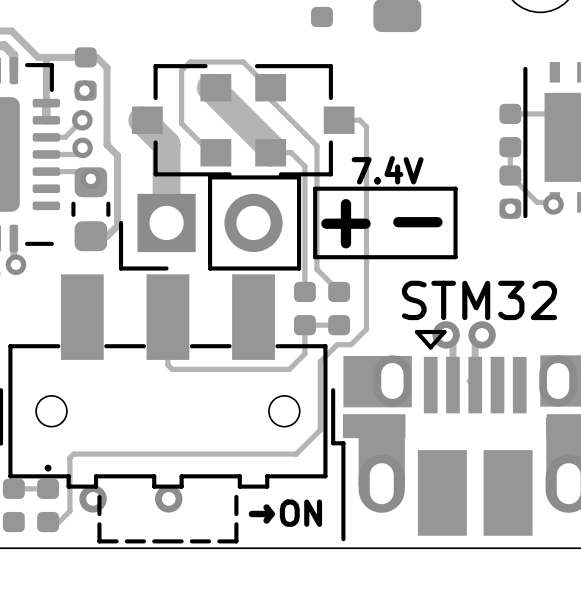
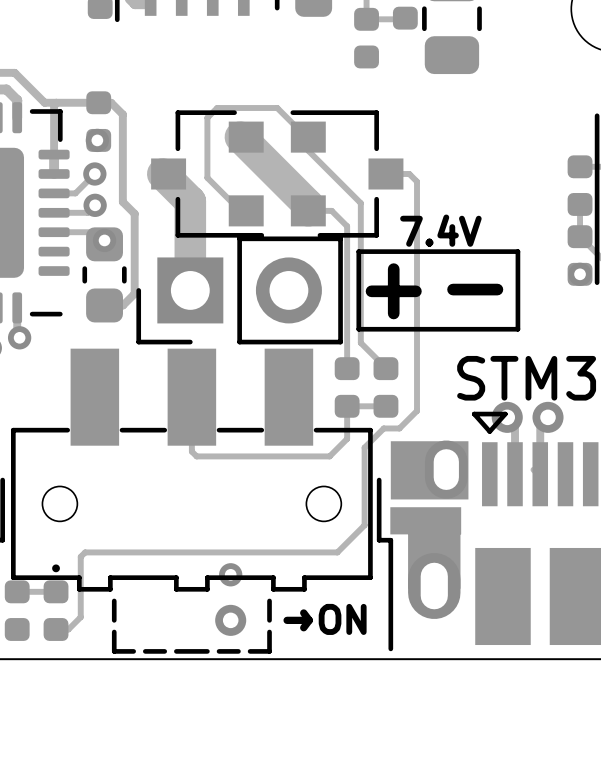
via: none -> (230, 574)
via: (93, 498) -> none
via position: (168, 498) -> (230, 620)

